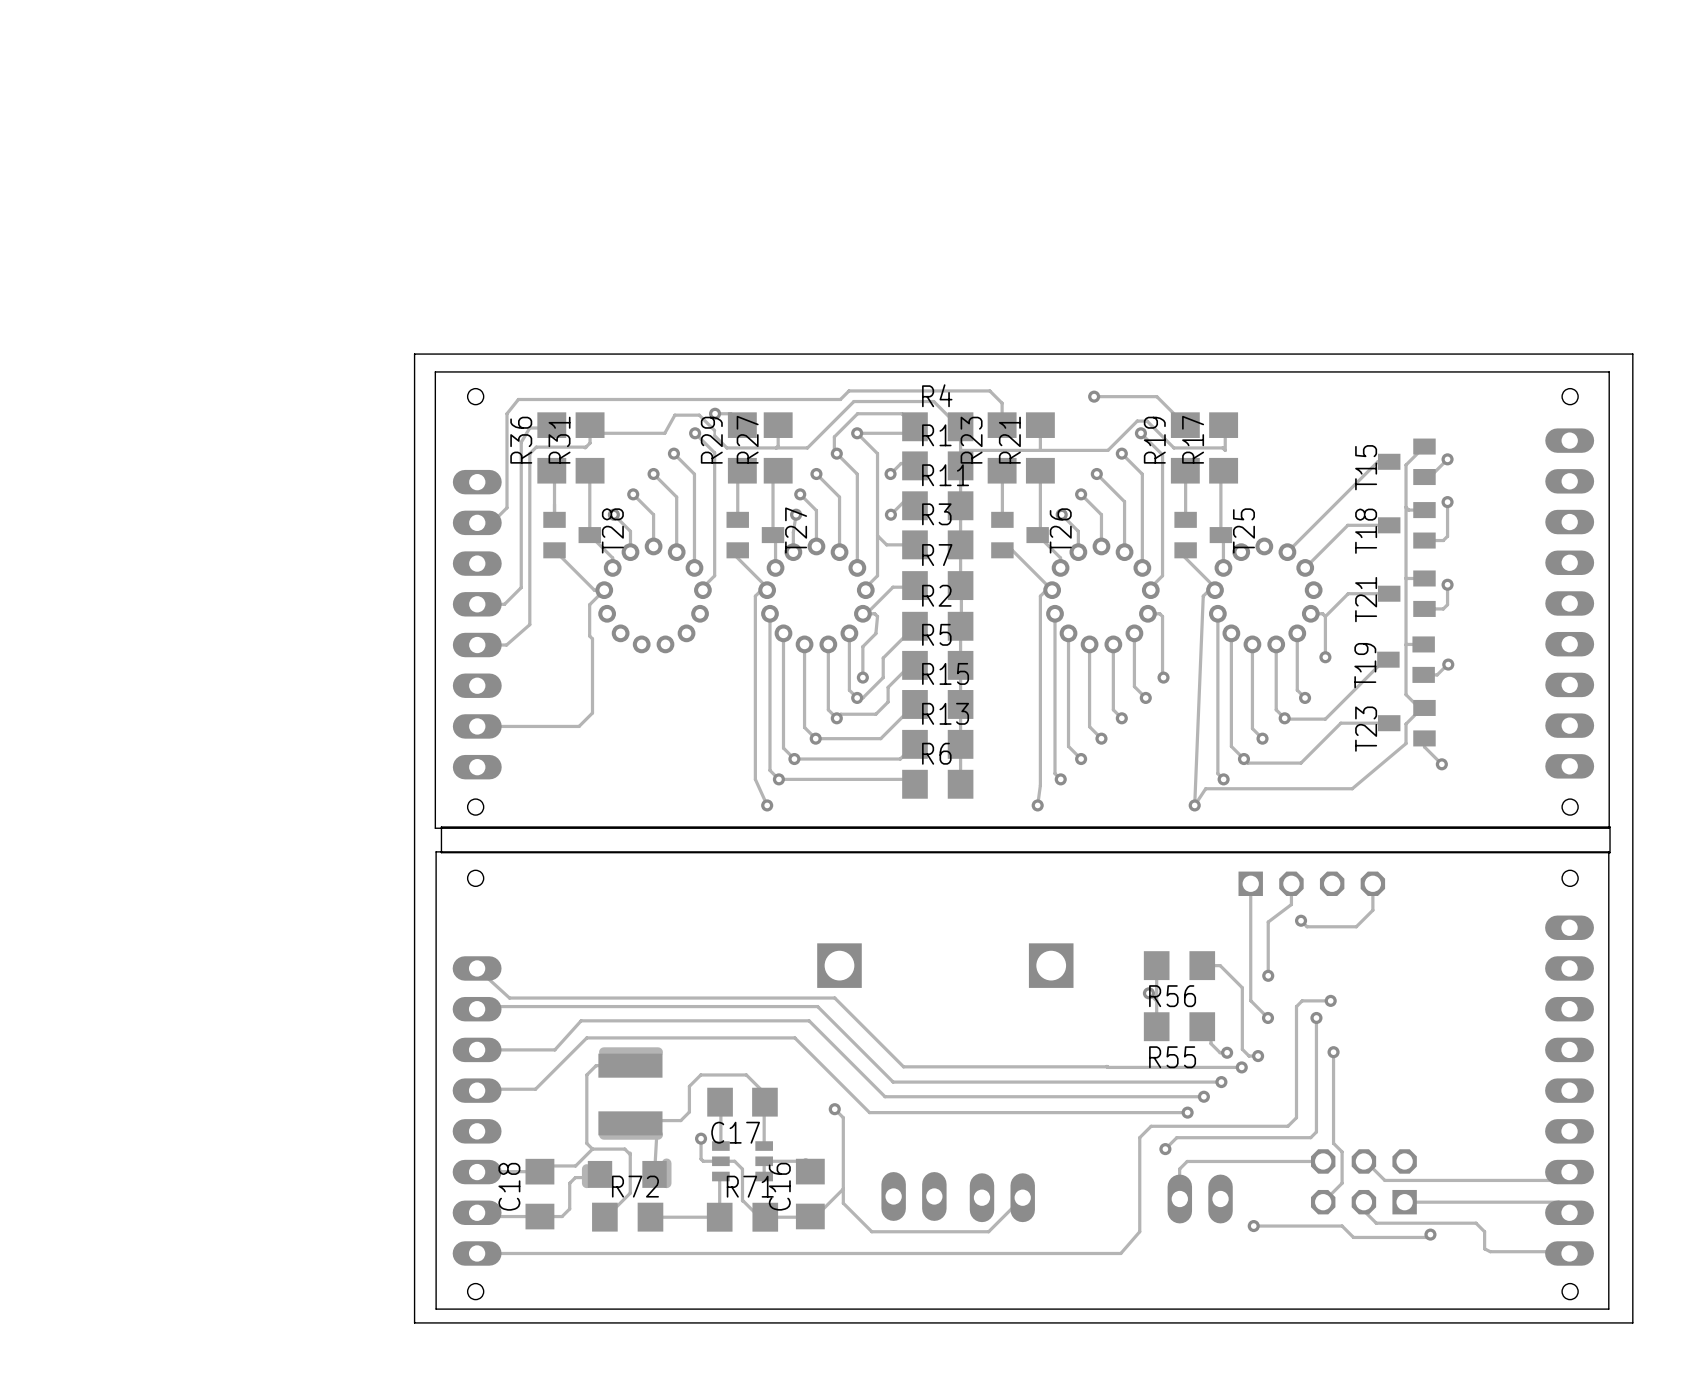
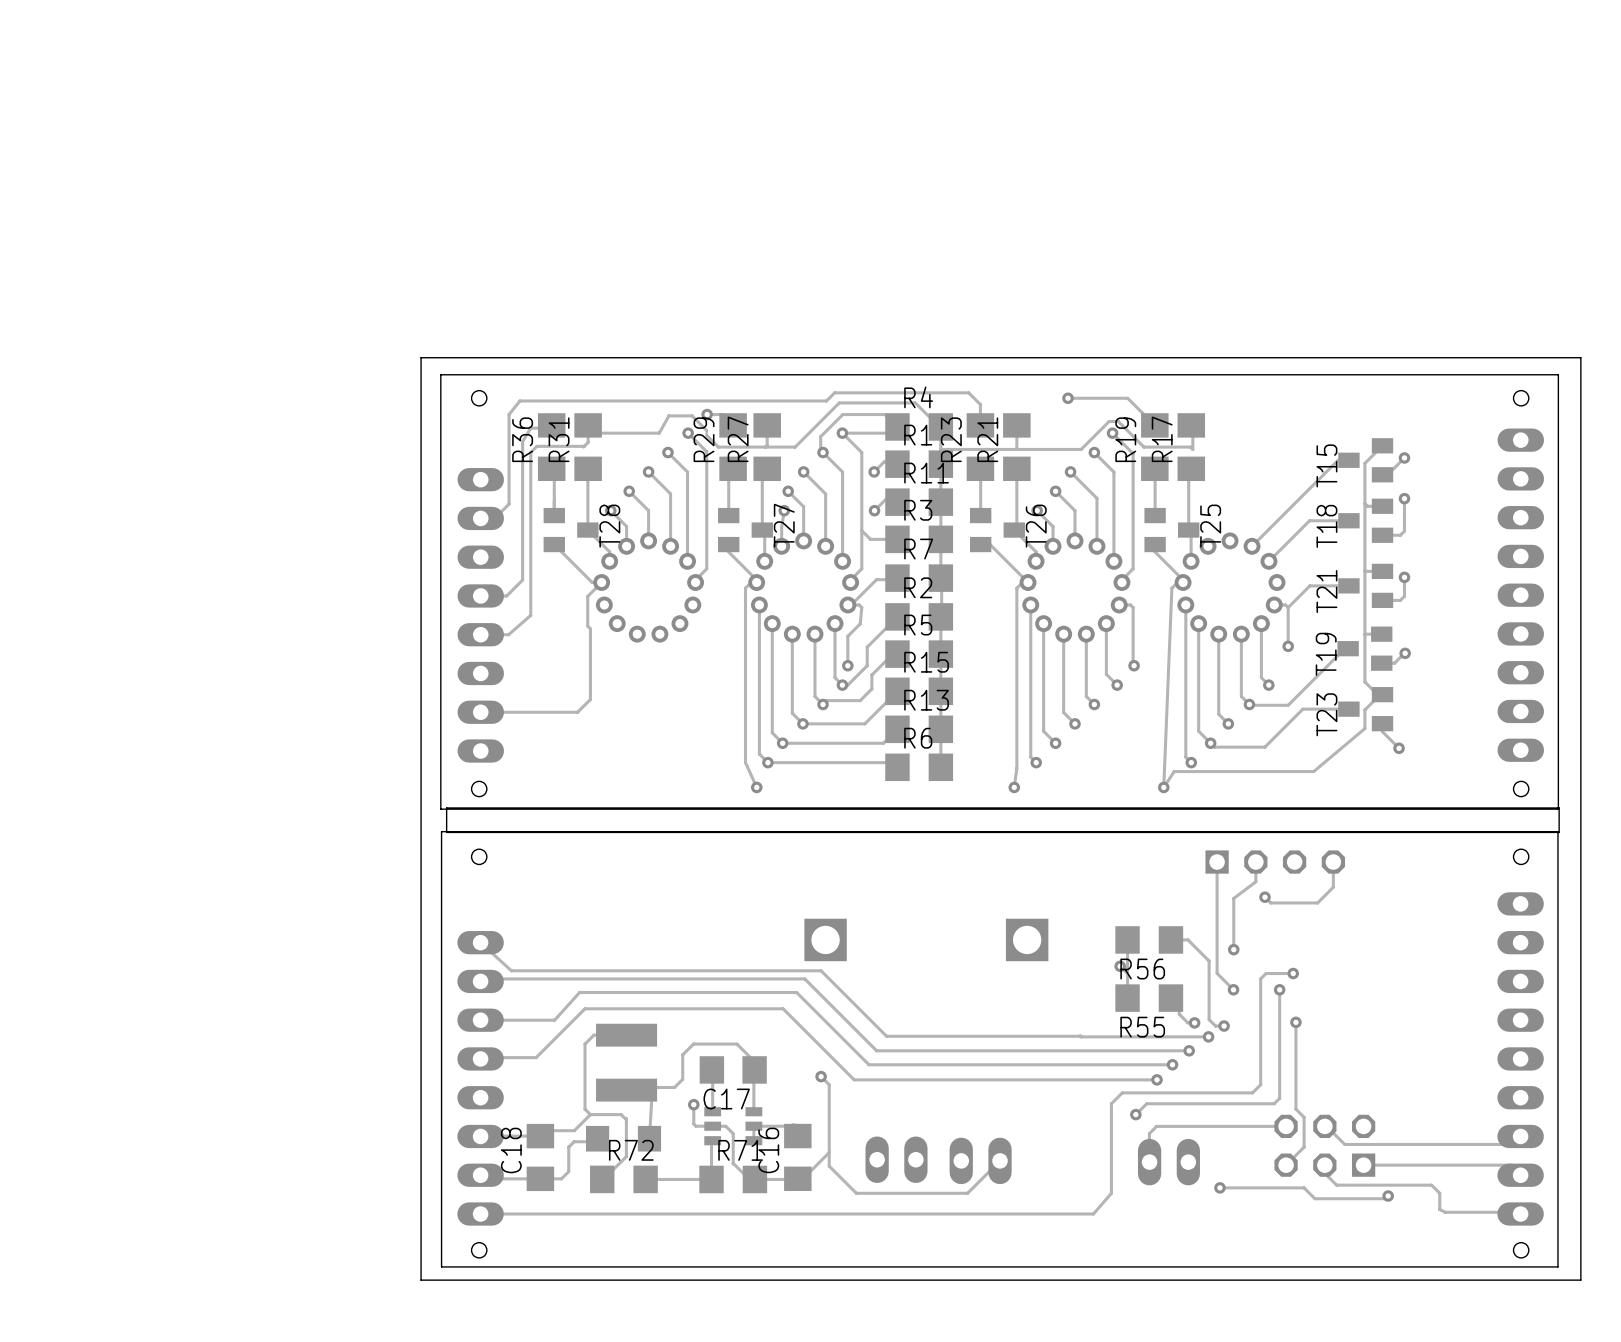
track: (658, 1052) (603, 1052) -> none
track: (658, 1134) (603, 1134) -> none
track: (666, 1163) (666, 1183) -> none
track: (586, 1169) (586, 1183) -> none

